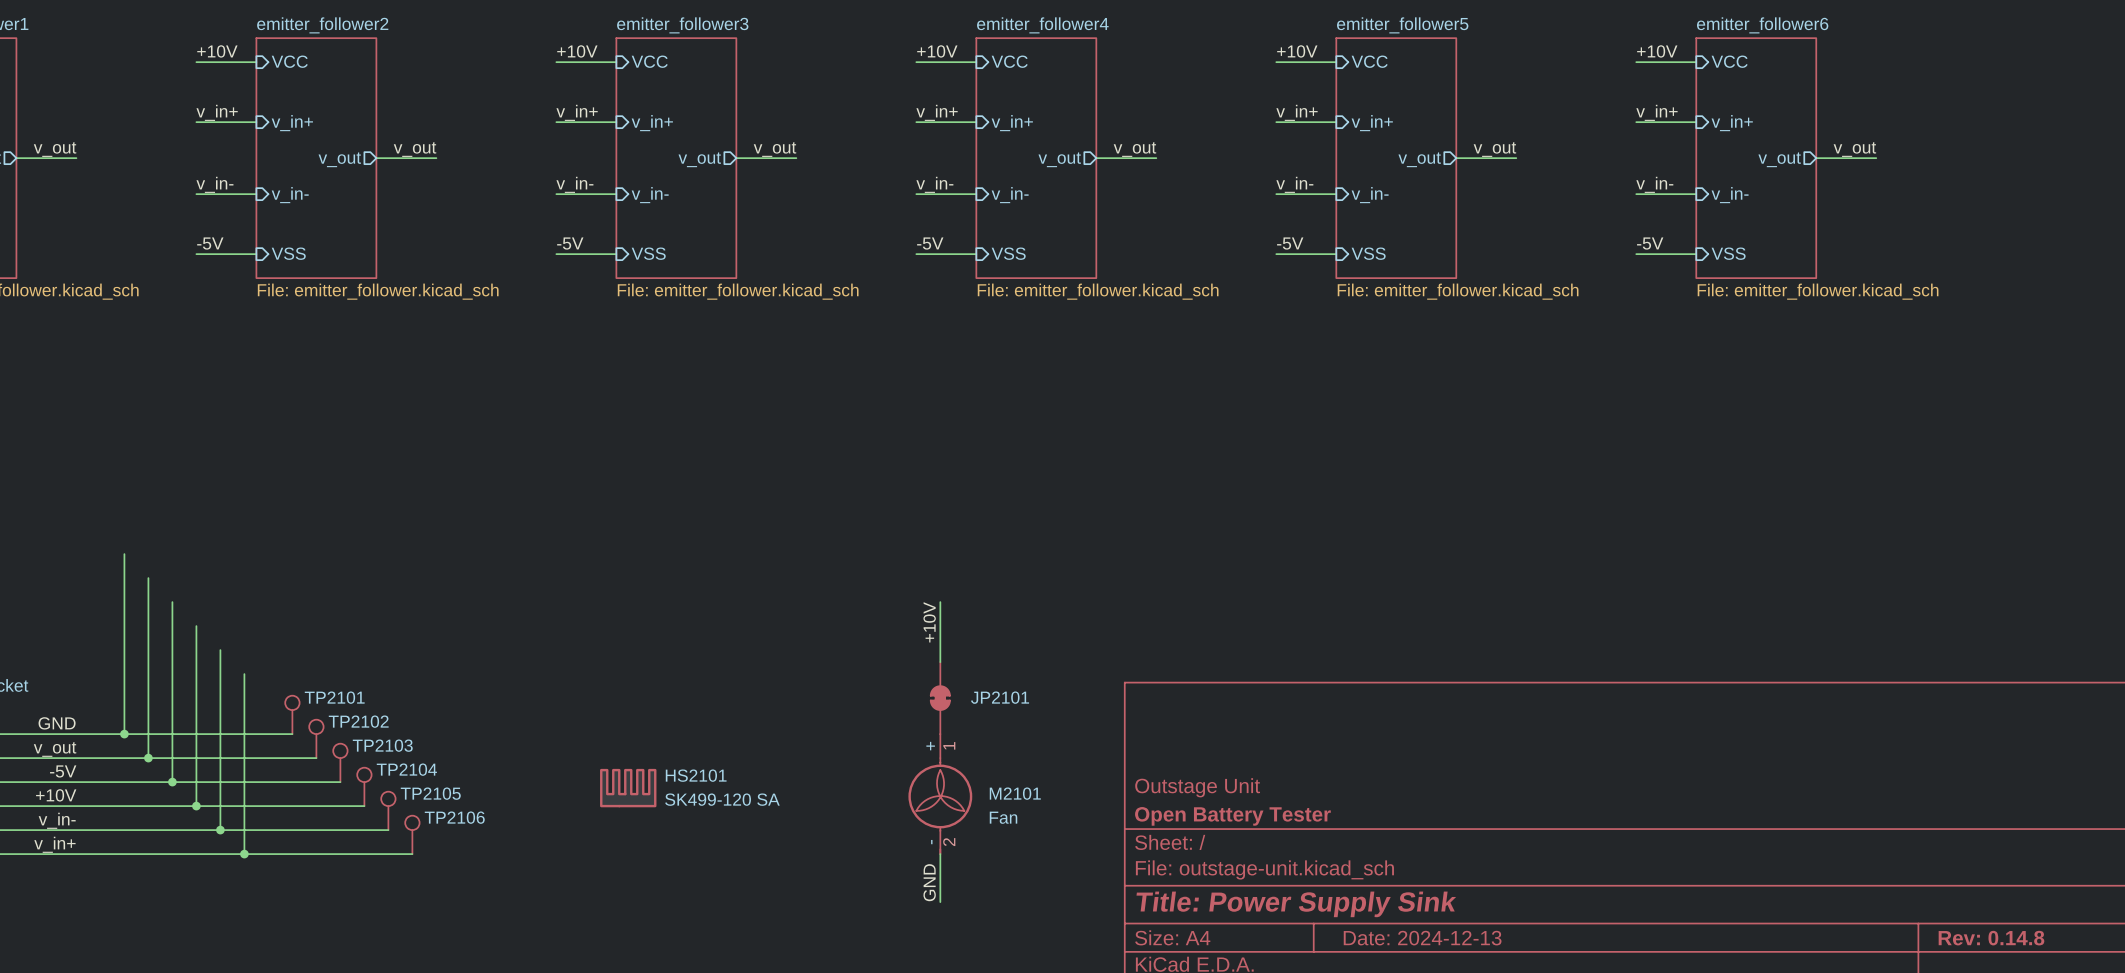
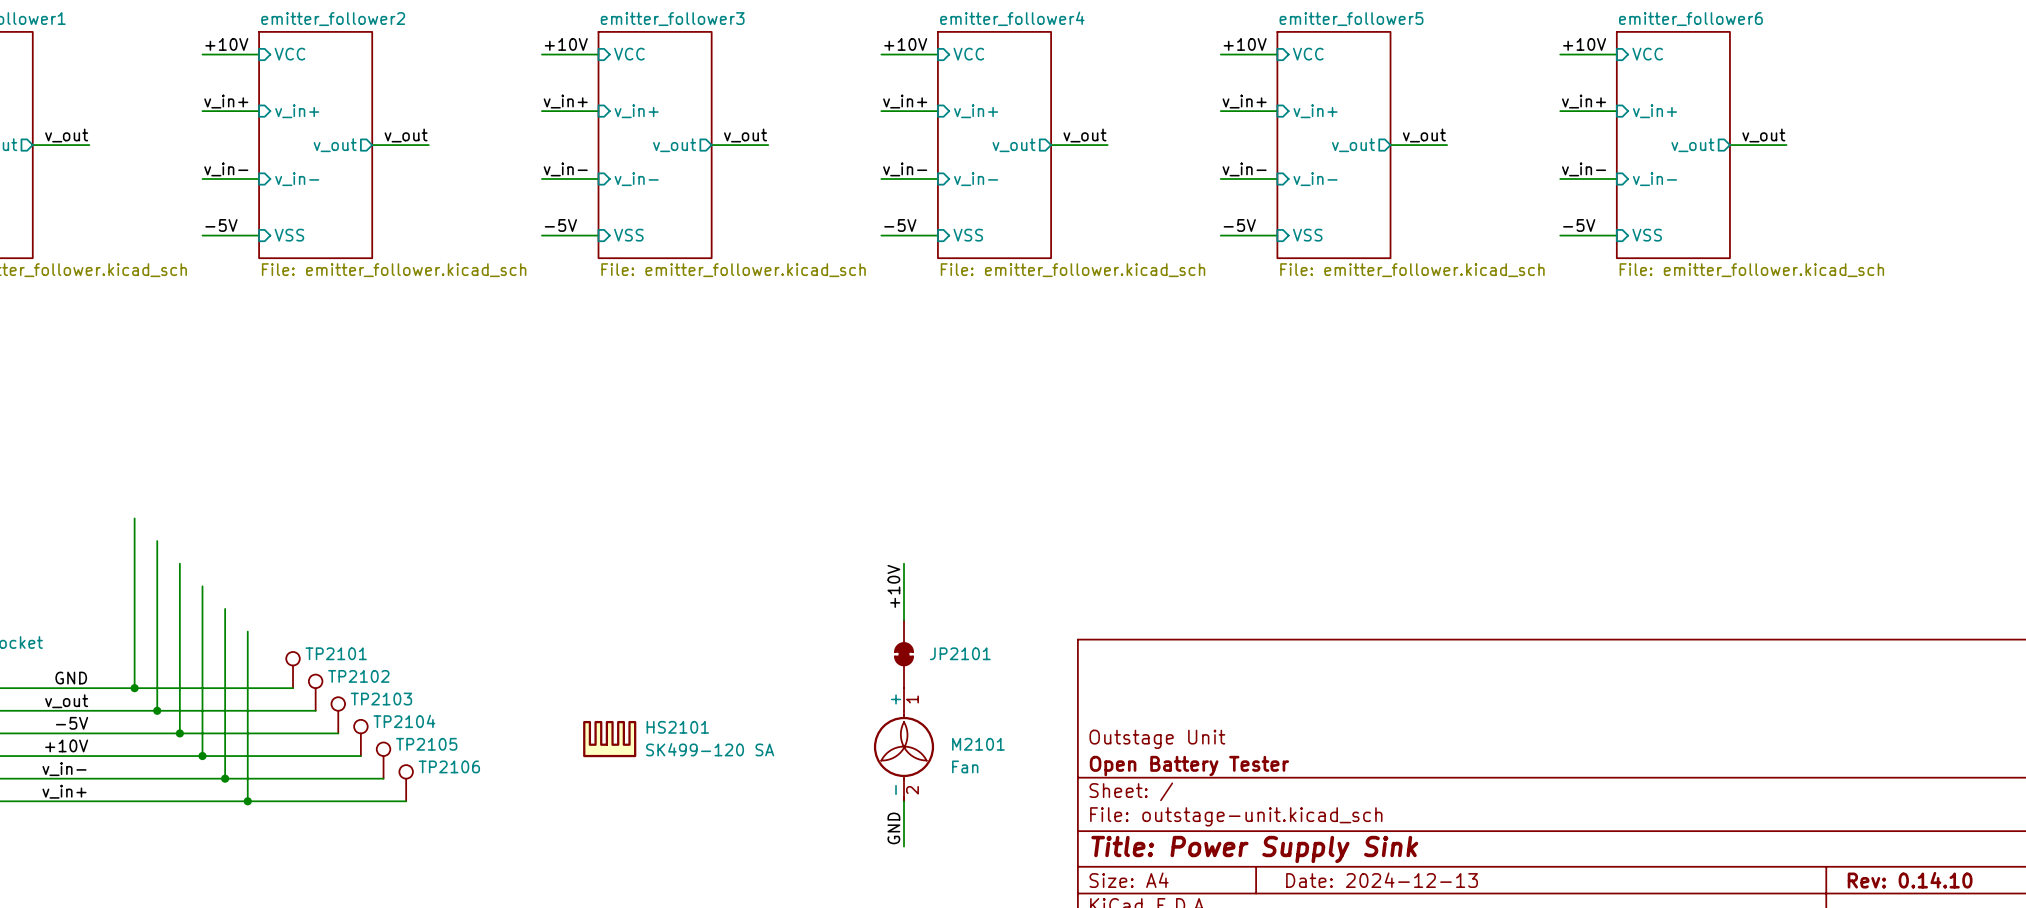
title block: Rev: 0.14.8 (1991, 938) -> Rev: 0.14.10 (1910, 880)

